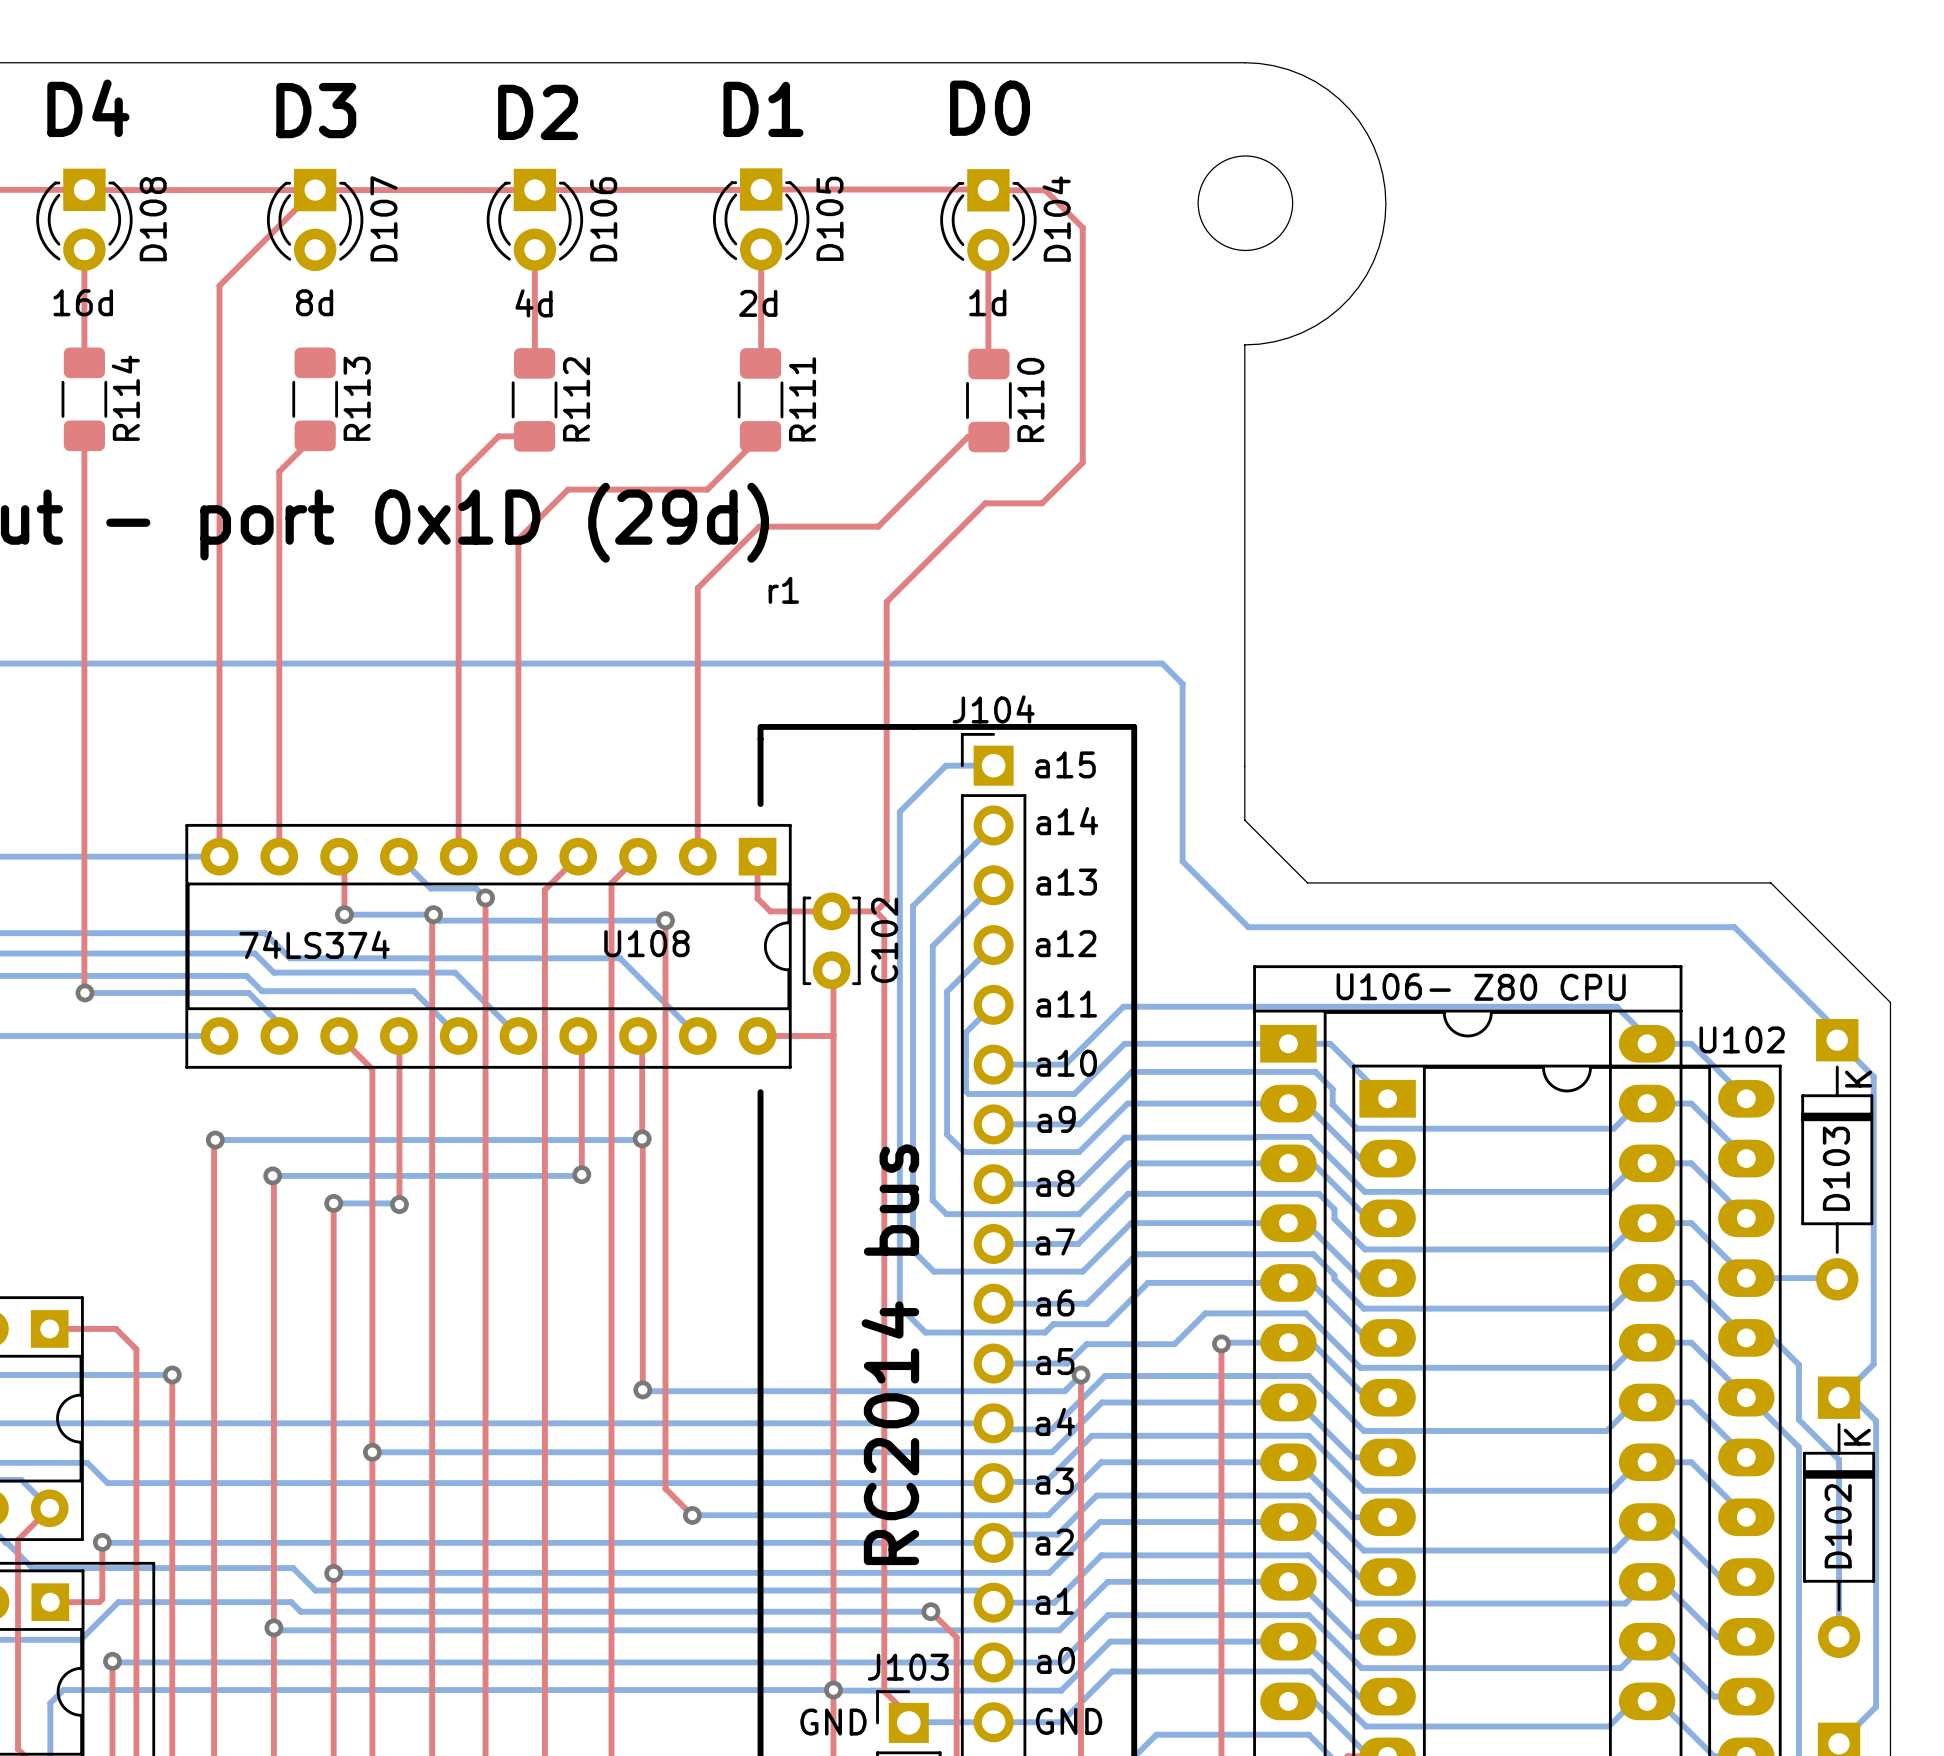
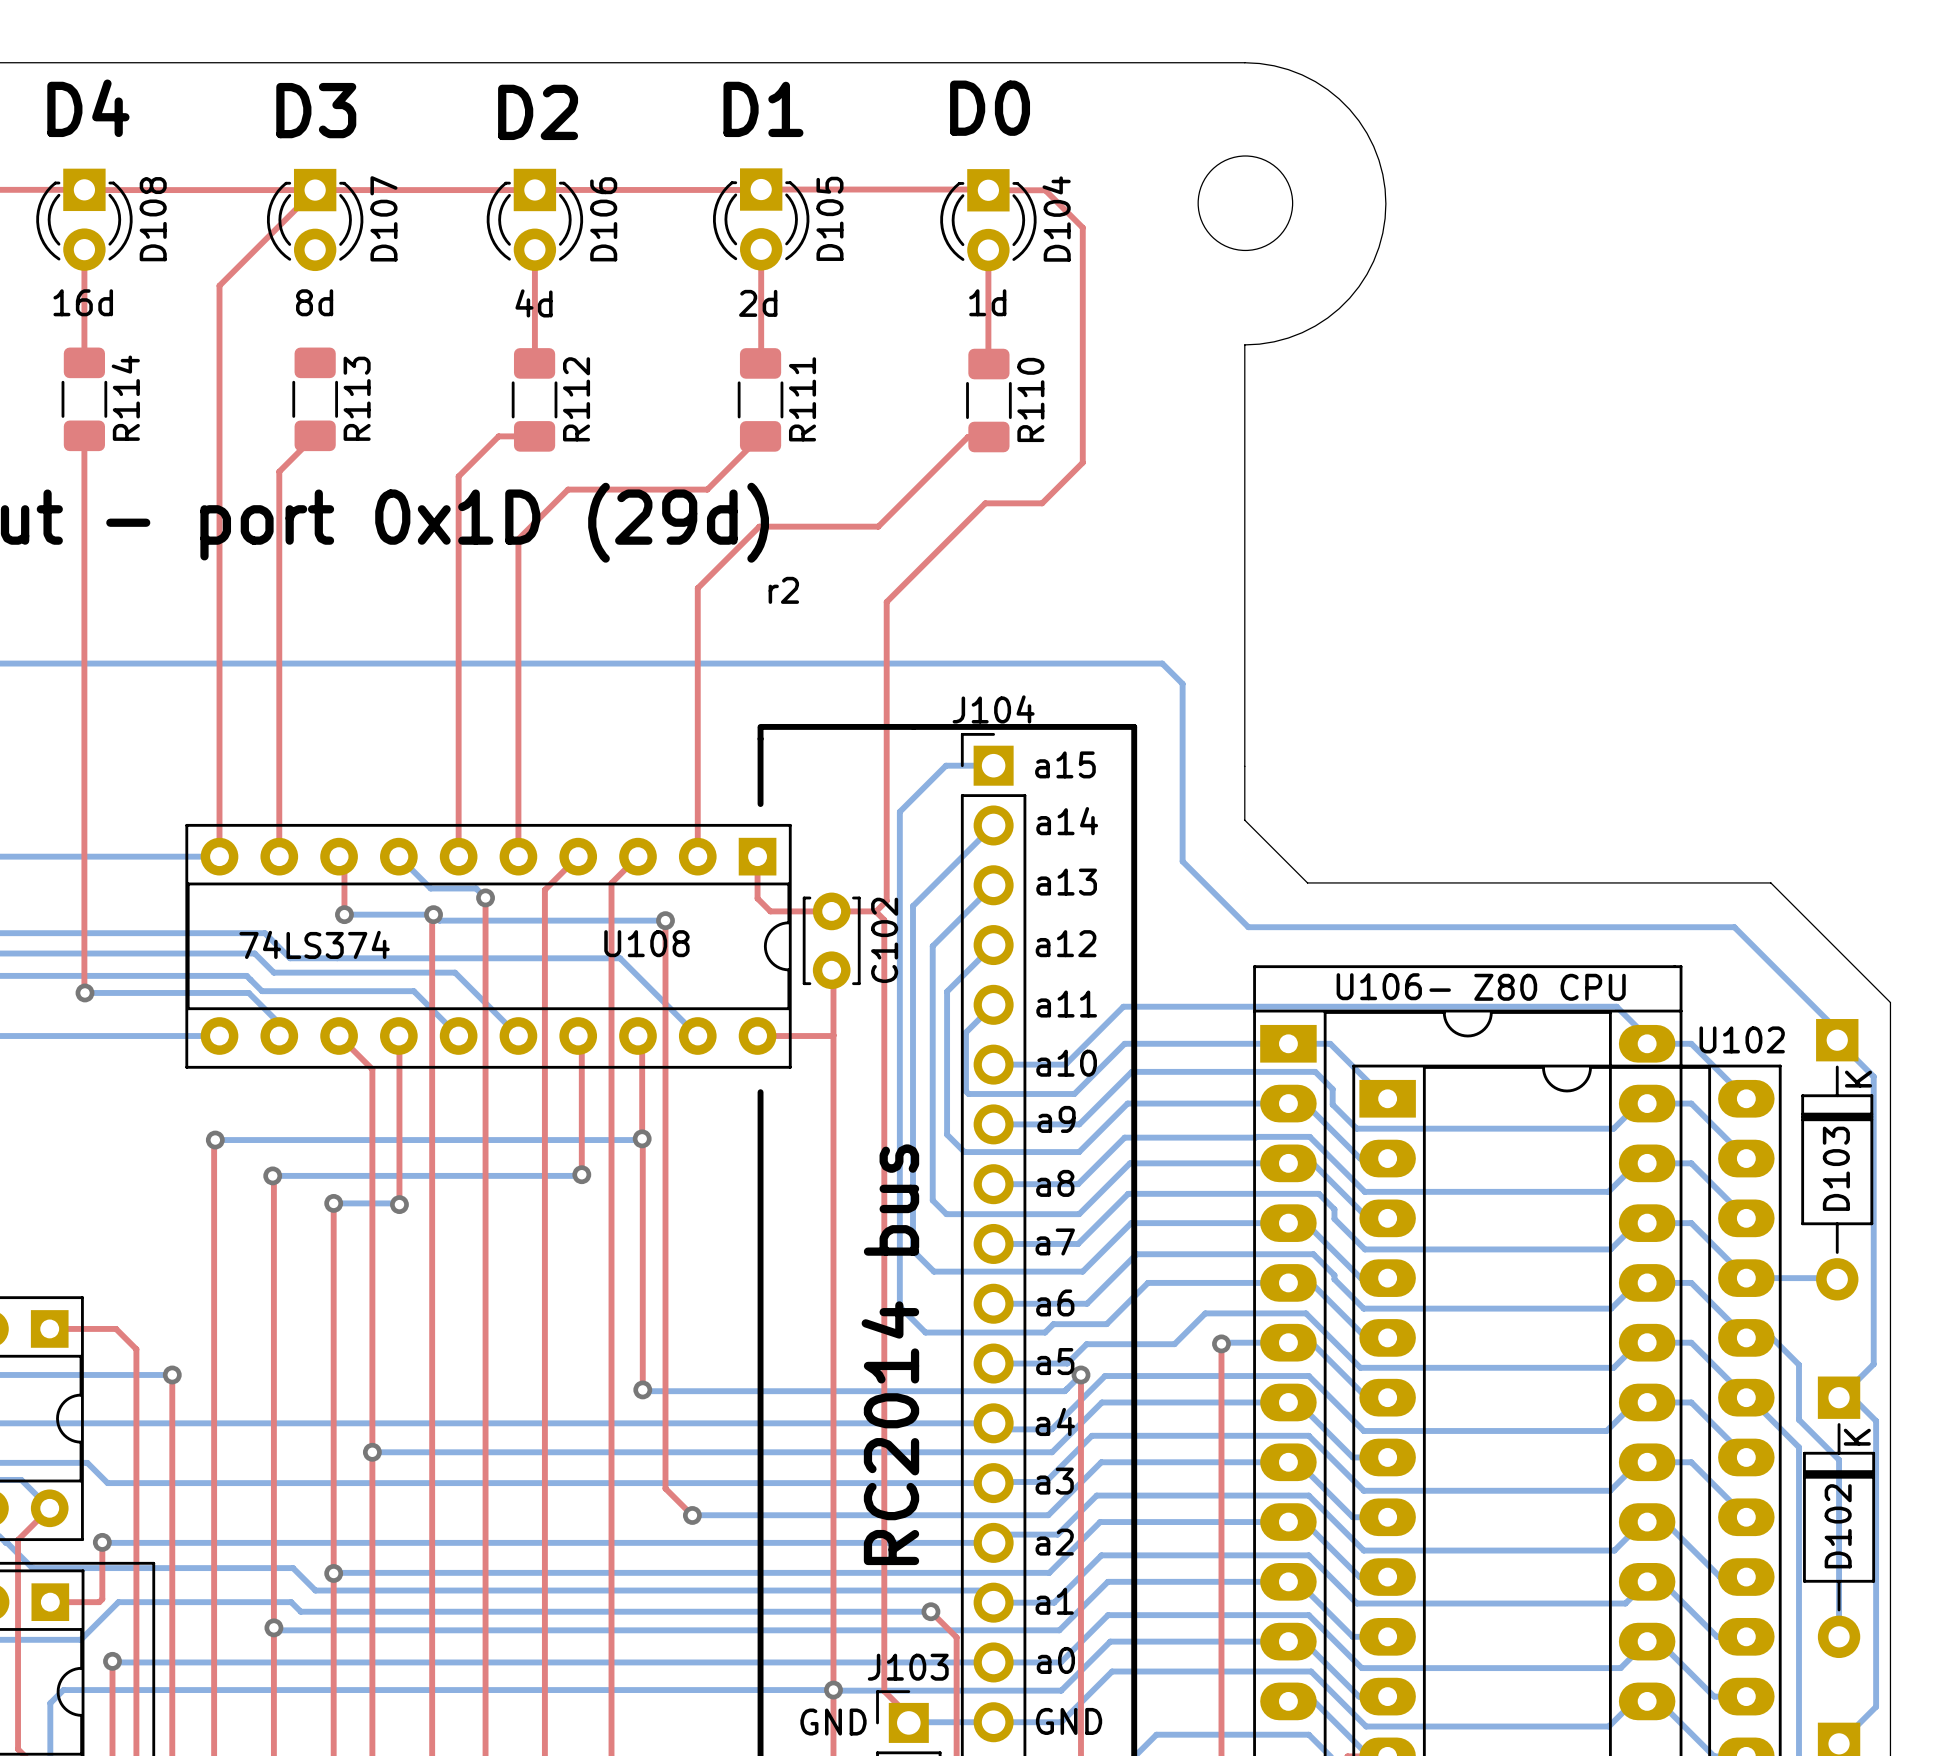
text: r1 (783, 590) -> r2 (783, 590)

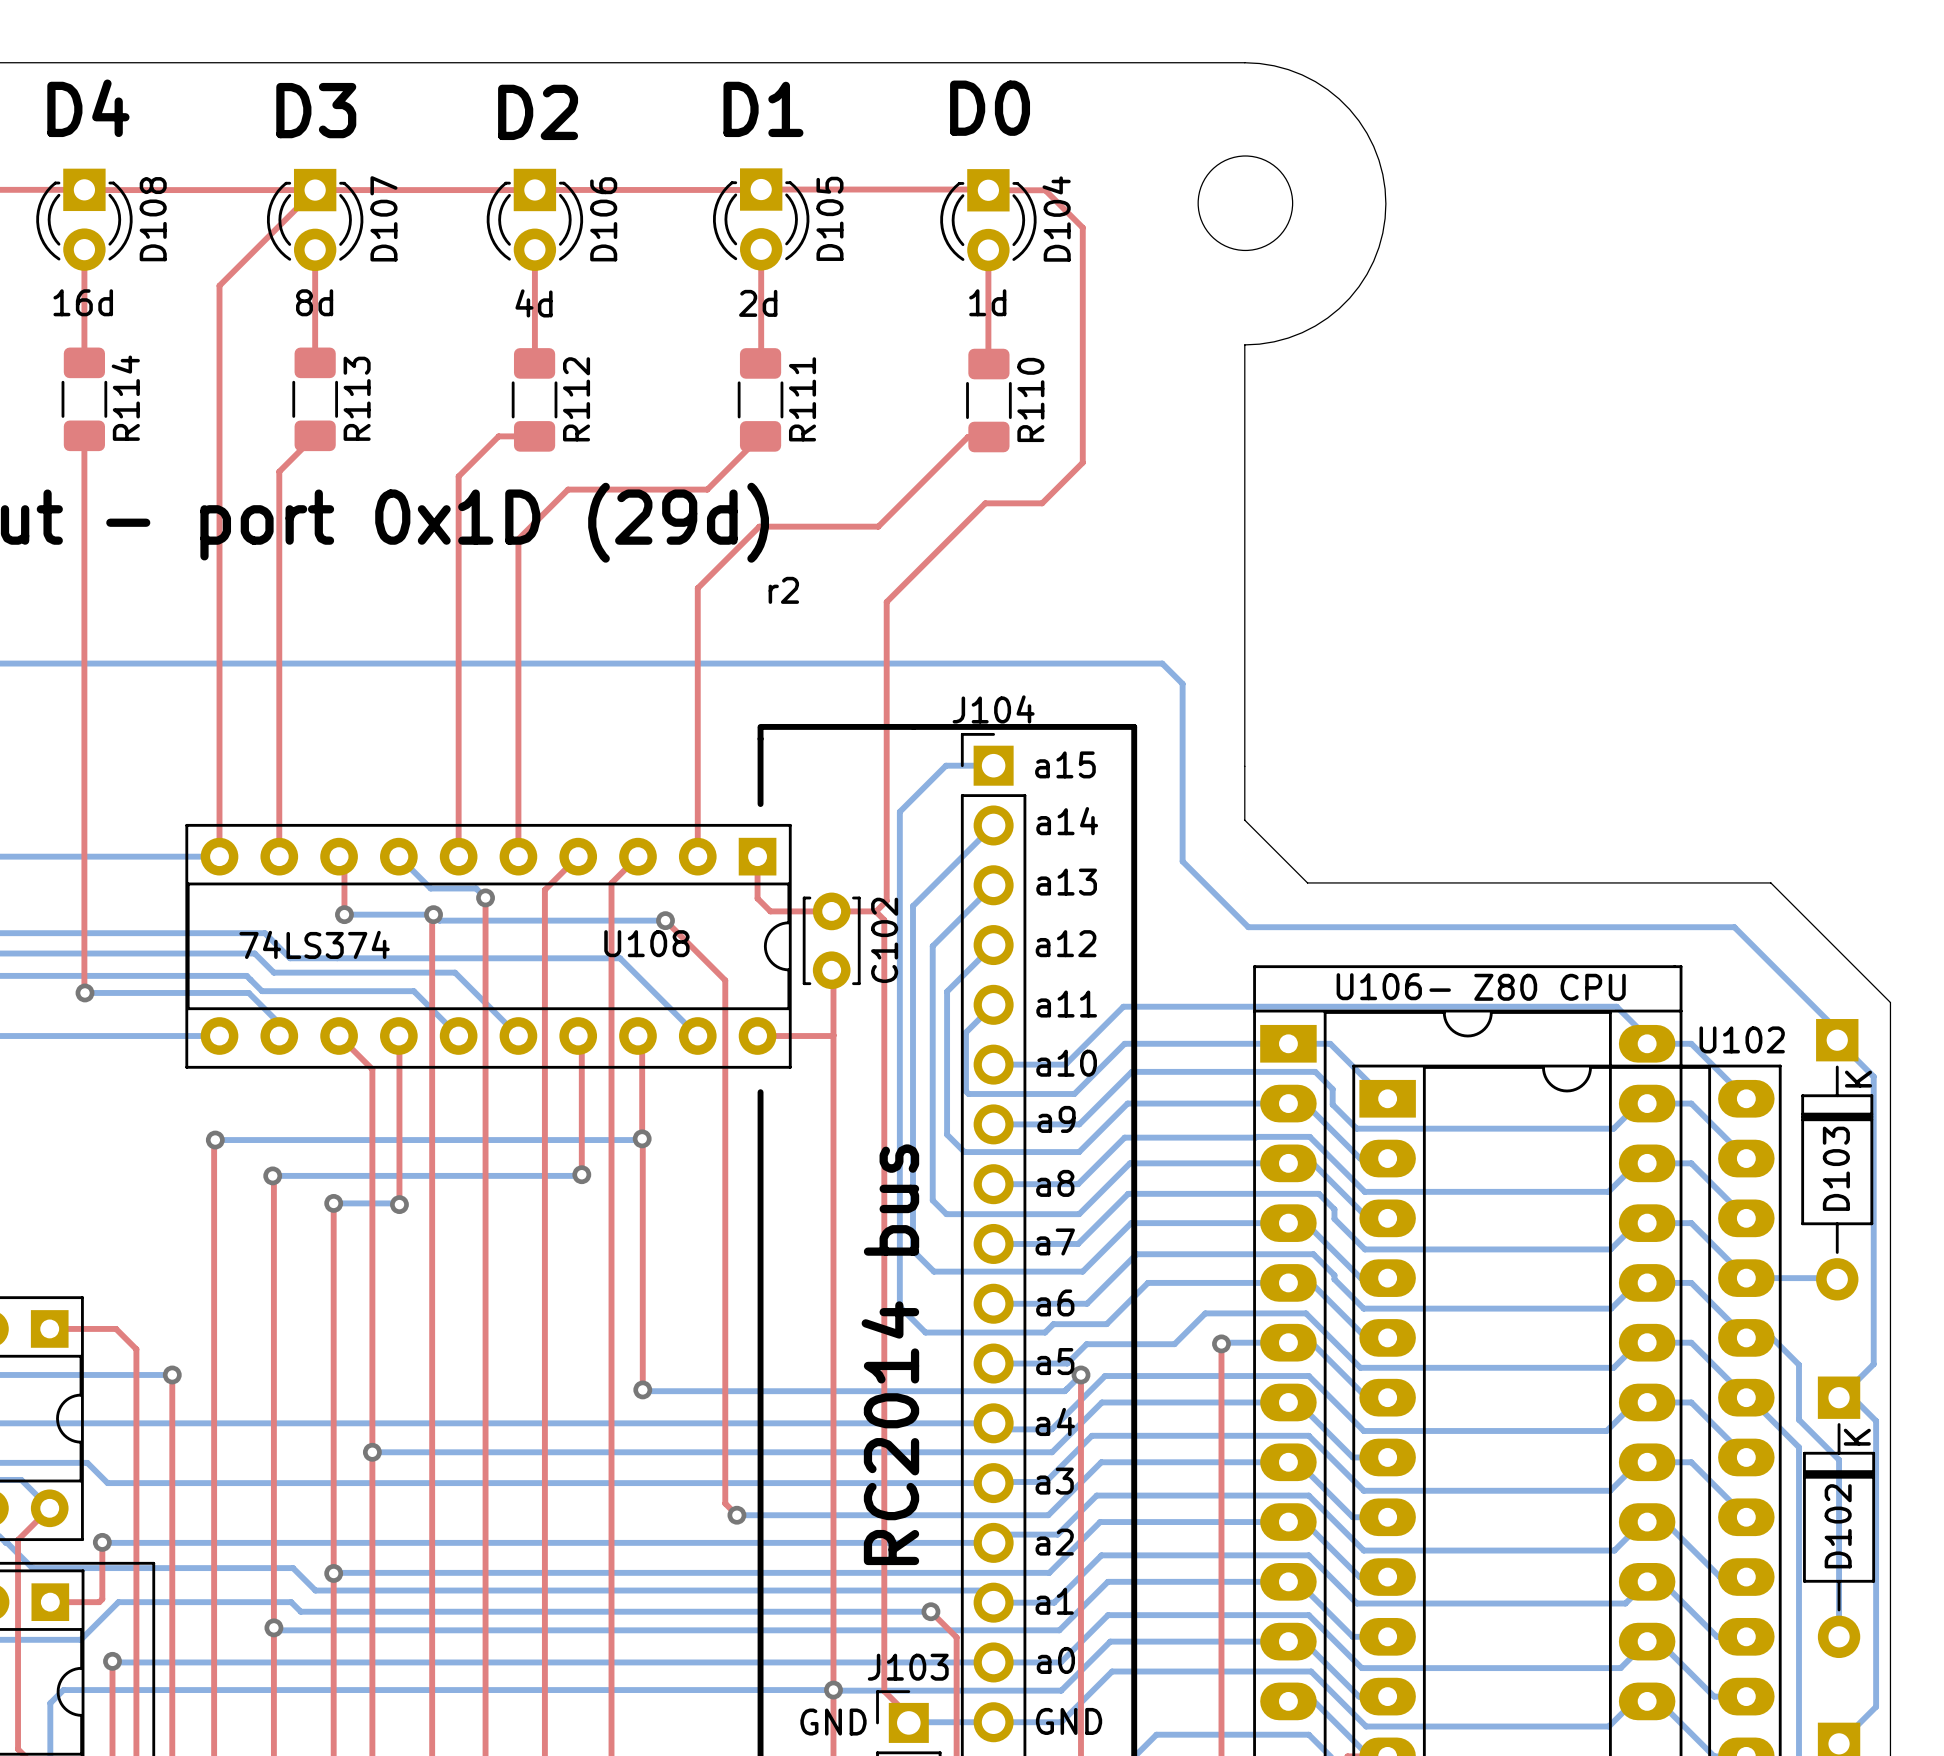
top track: none -> (315, 249) (315, 362)
top track: (665, 920) (665, 1488) (692, 1515) -> (665, 920) (725, 980) (725, 1503) (736, 1515)
bottom track: (692, 1515) (736, 1515) -> none
via position: (692, 1515) -> (736, 1515)

